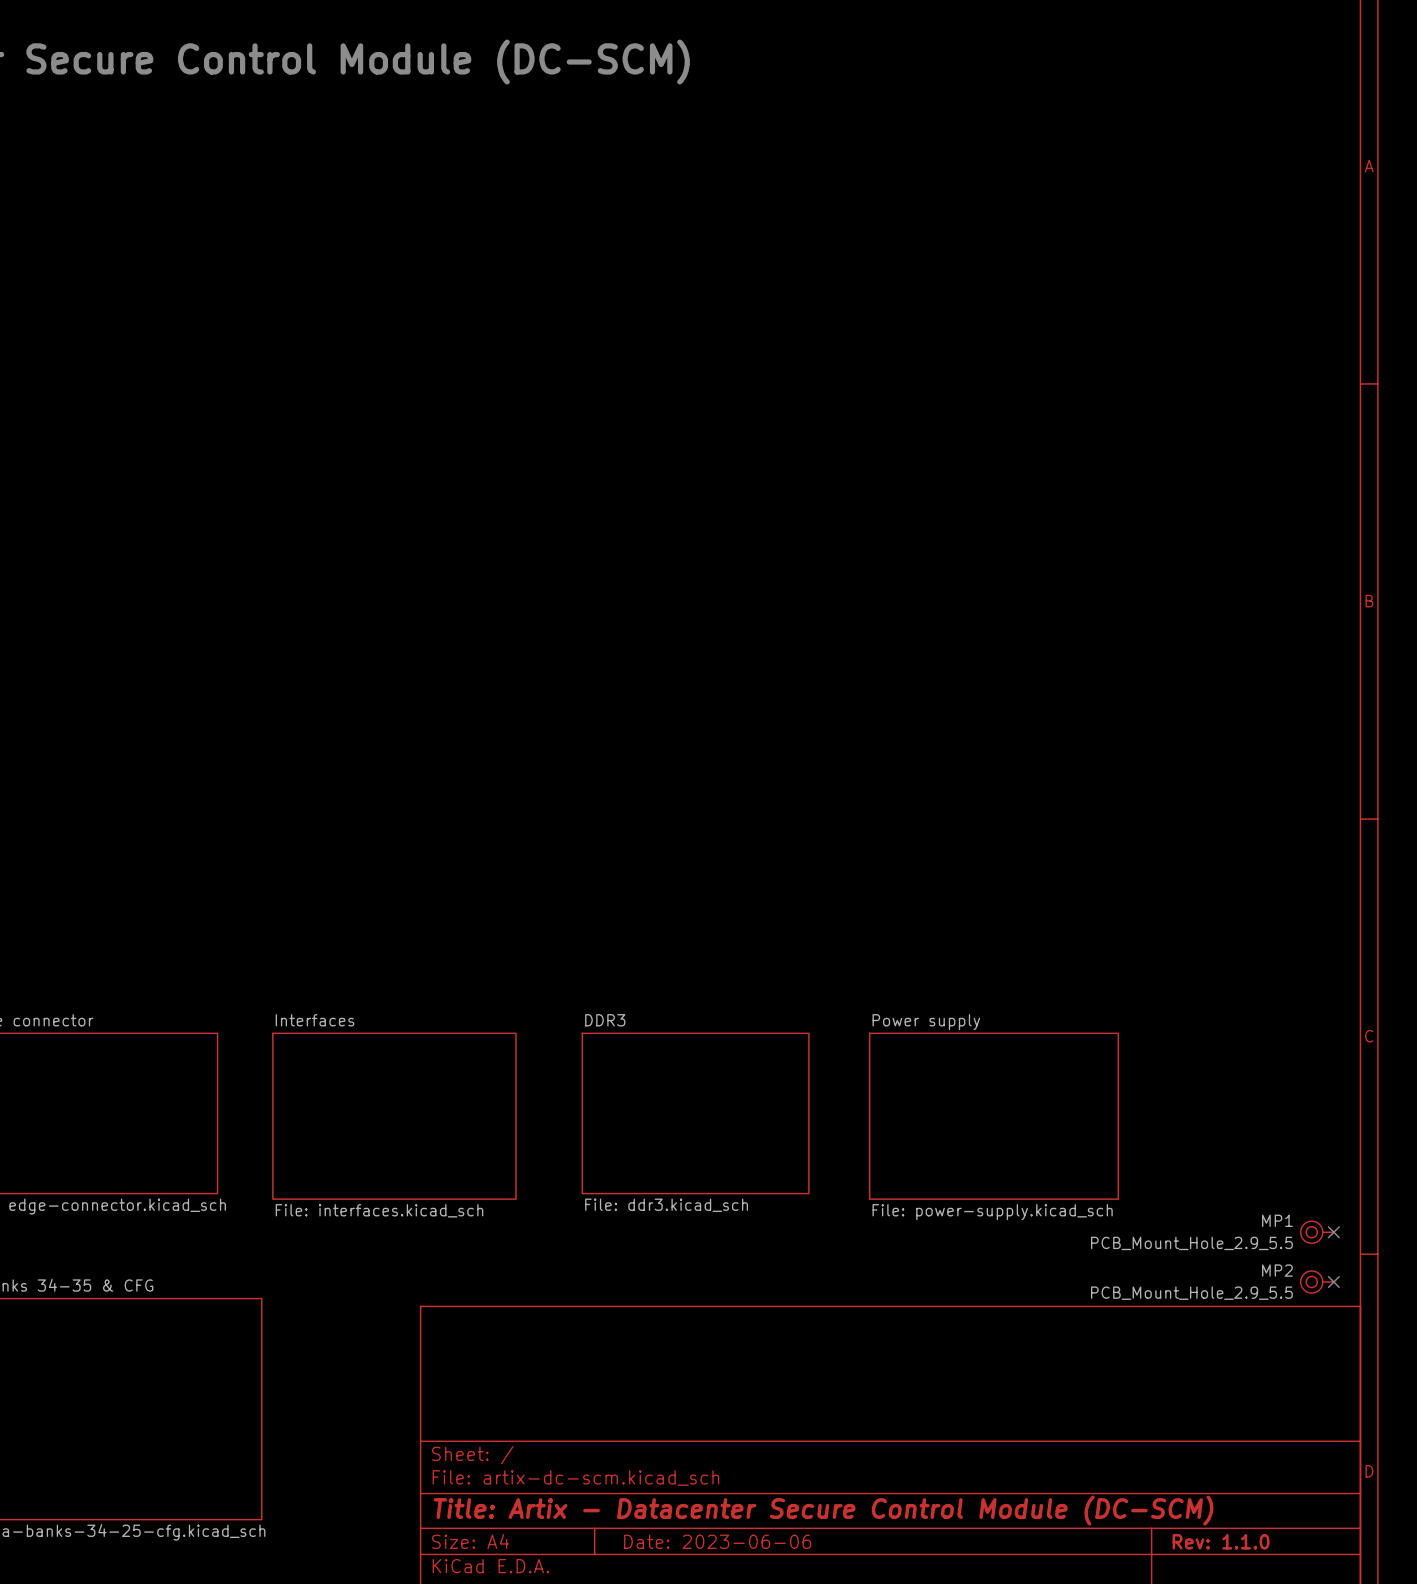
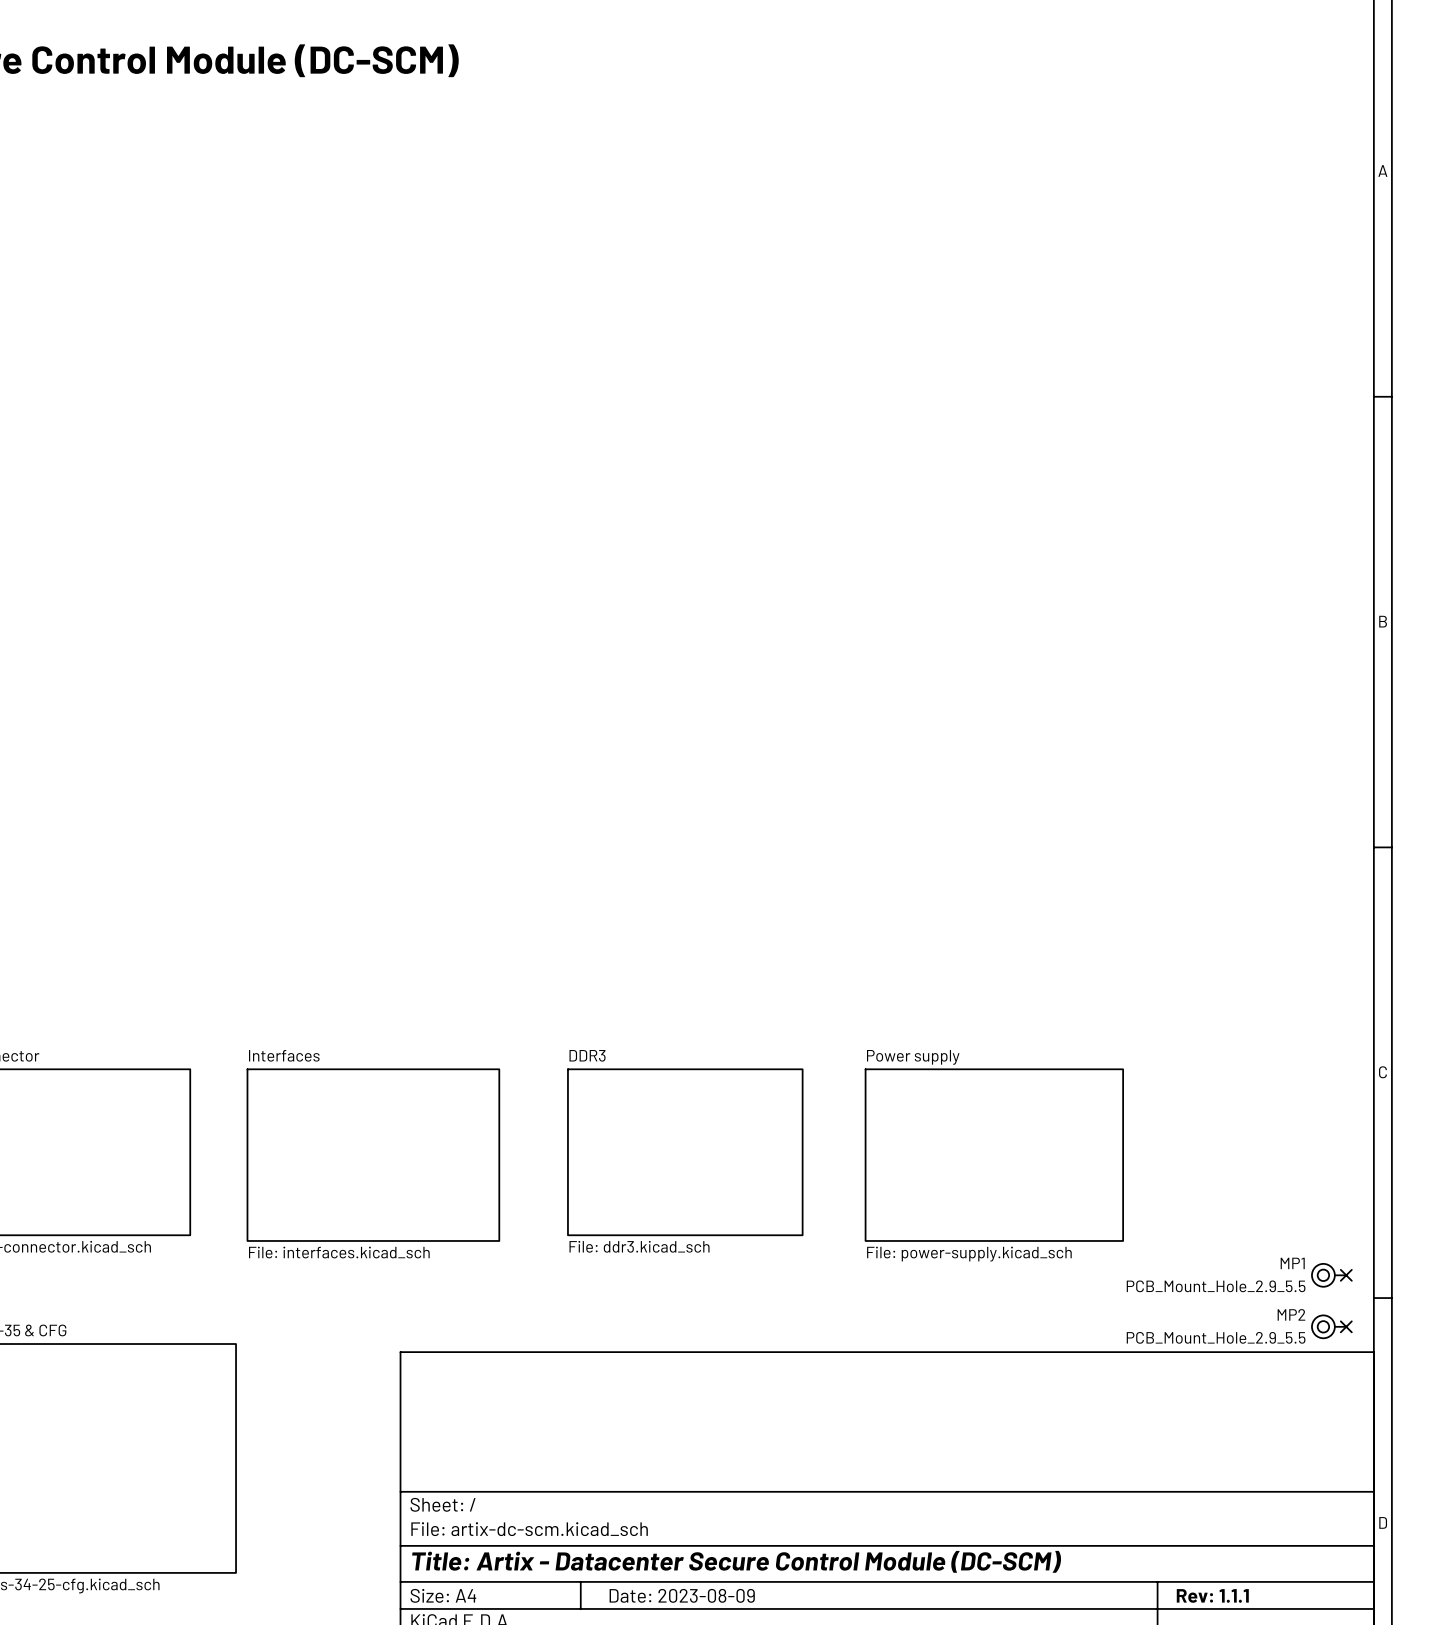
title block: Date: 2023-06-06 (717, 1541) -> Date: 2023-08-09 (682, 1595)
title block: Rev: 1.1.0 (1221, 1541) -> Rev: 1.1.1 (1212, 1595)

